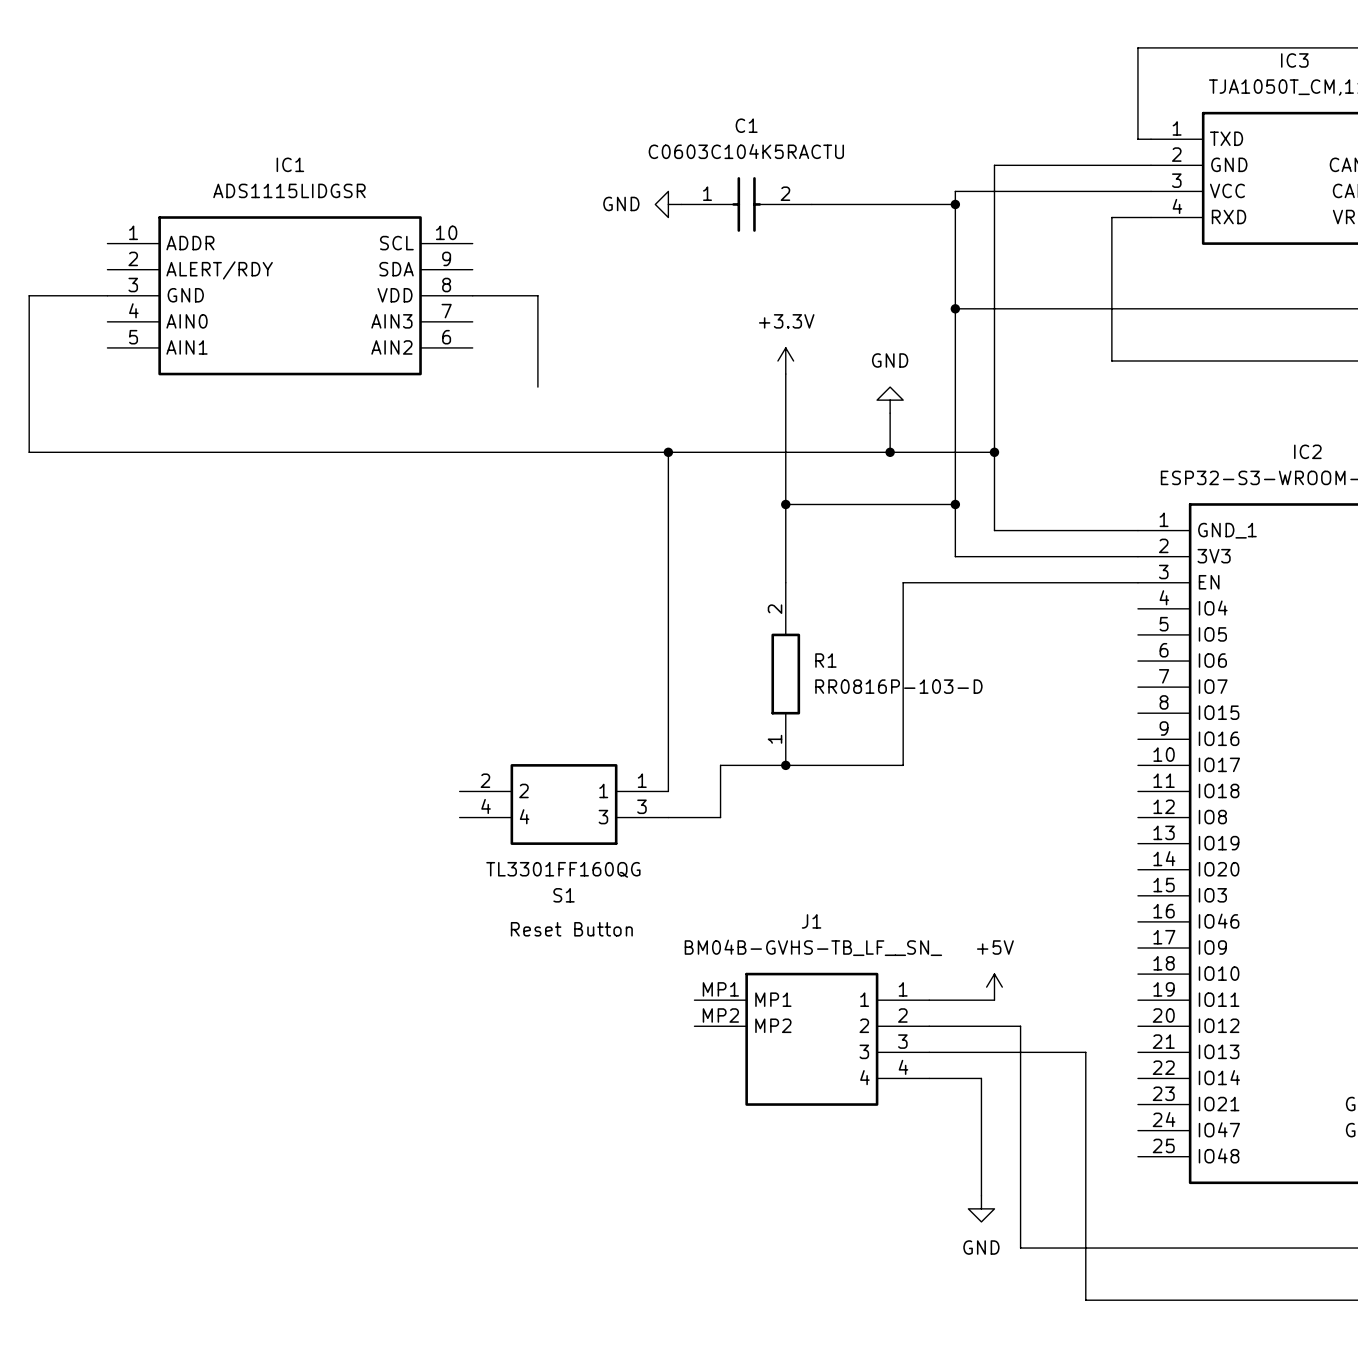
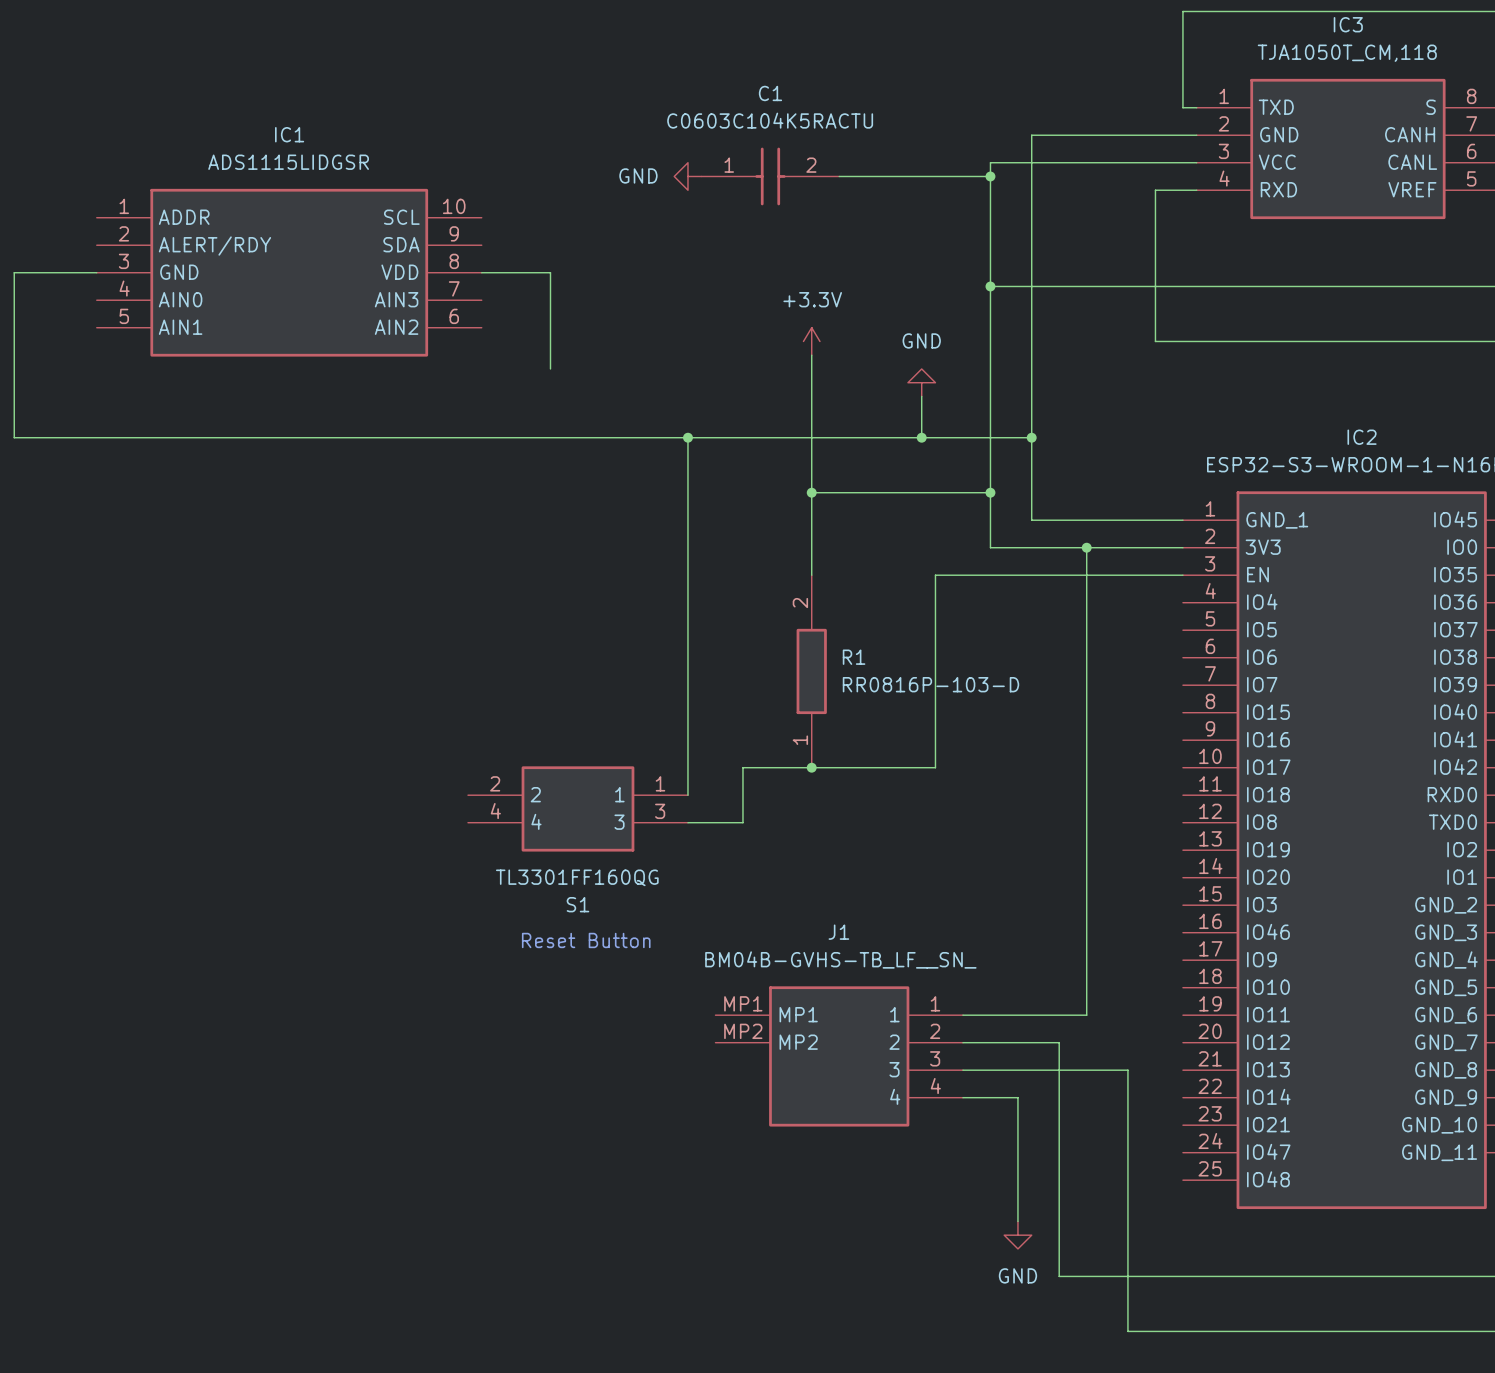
wire: none -> (1086, 547) (1086, 1015) (1031, 1015)
junction: none -> (1086, 547)
power symbol: +5V (994, 987) -> none

